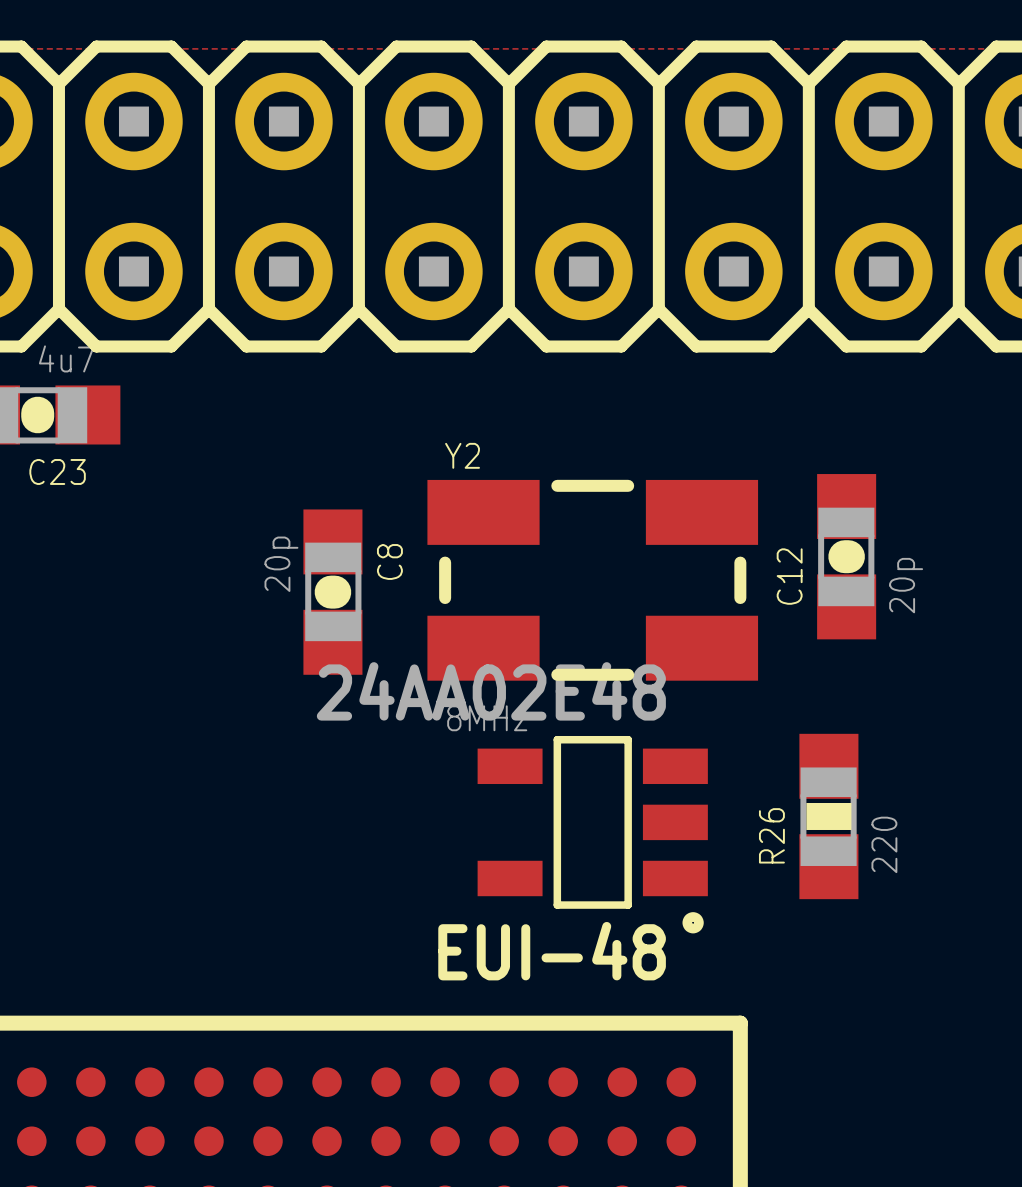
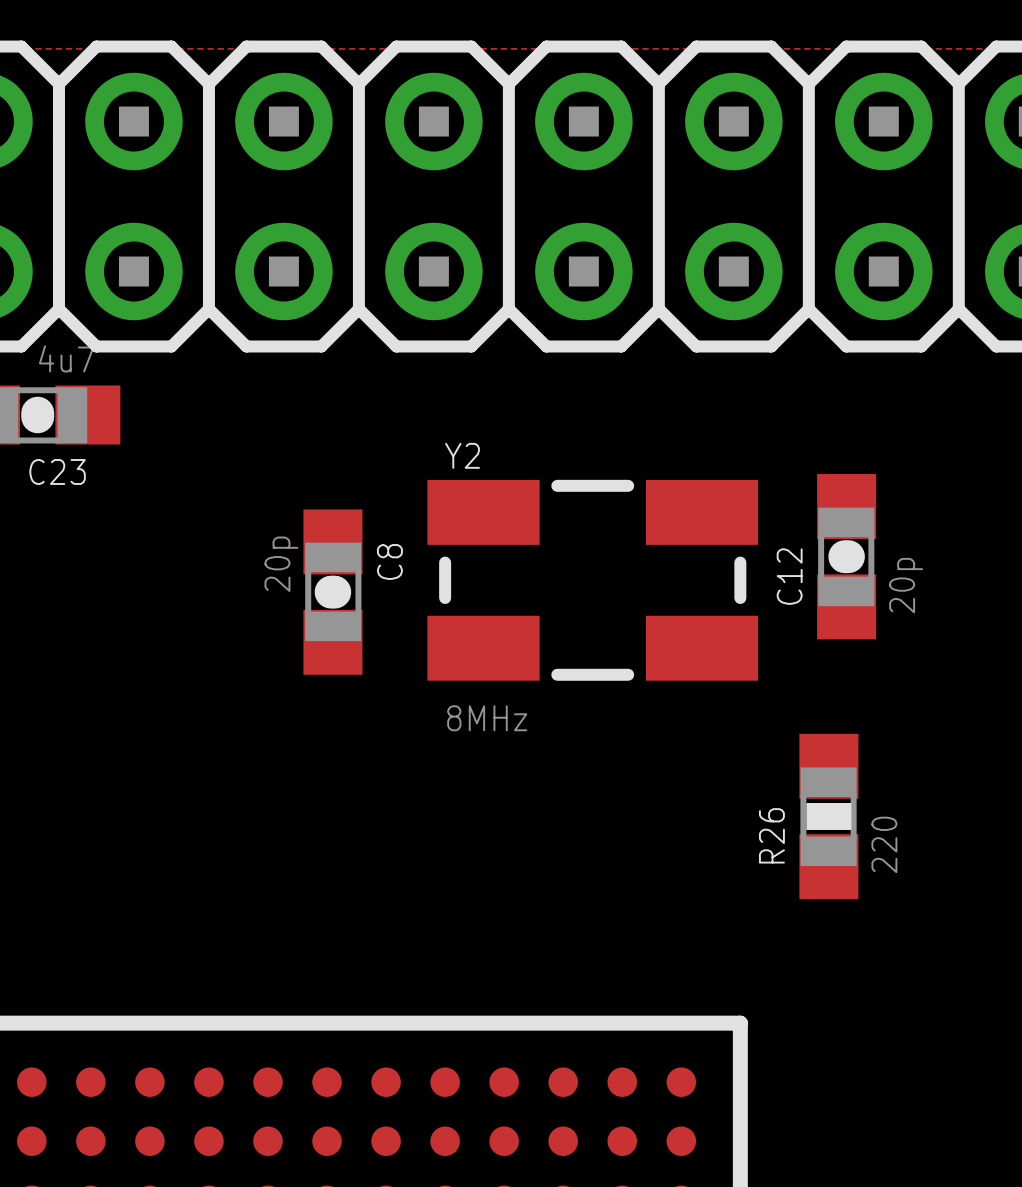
EUI-48: 24AA02E48 (592, 834) -> none

